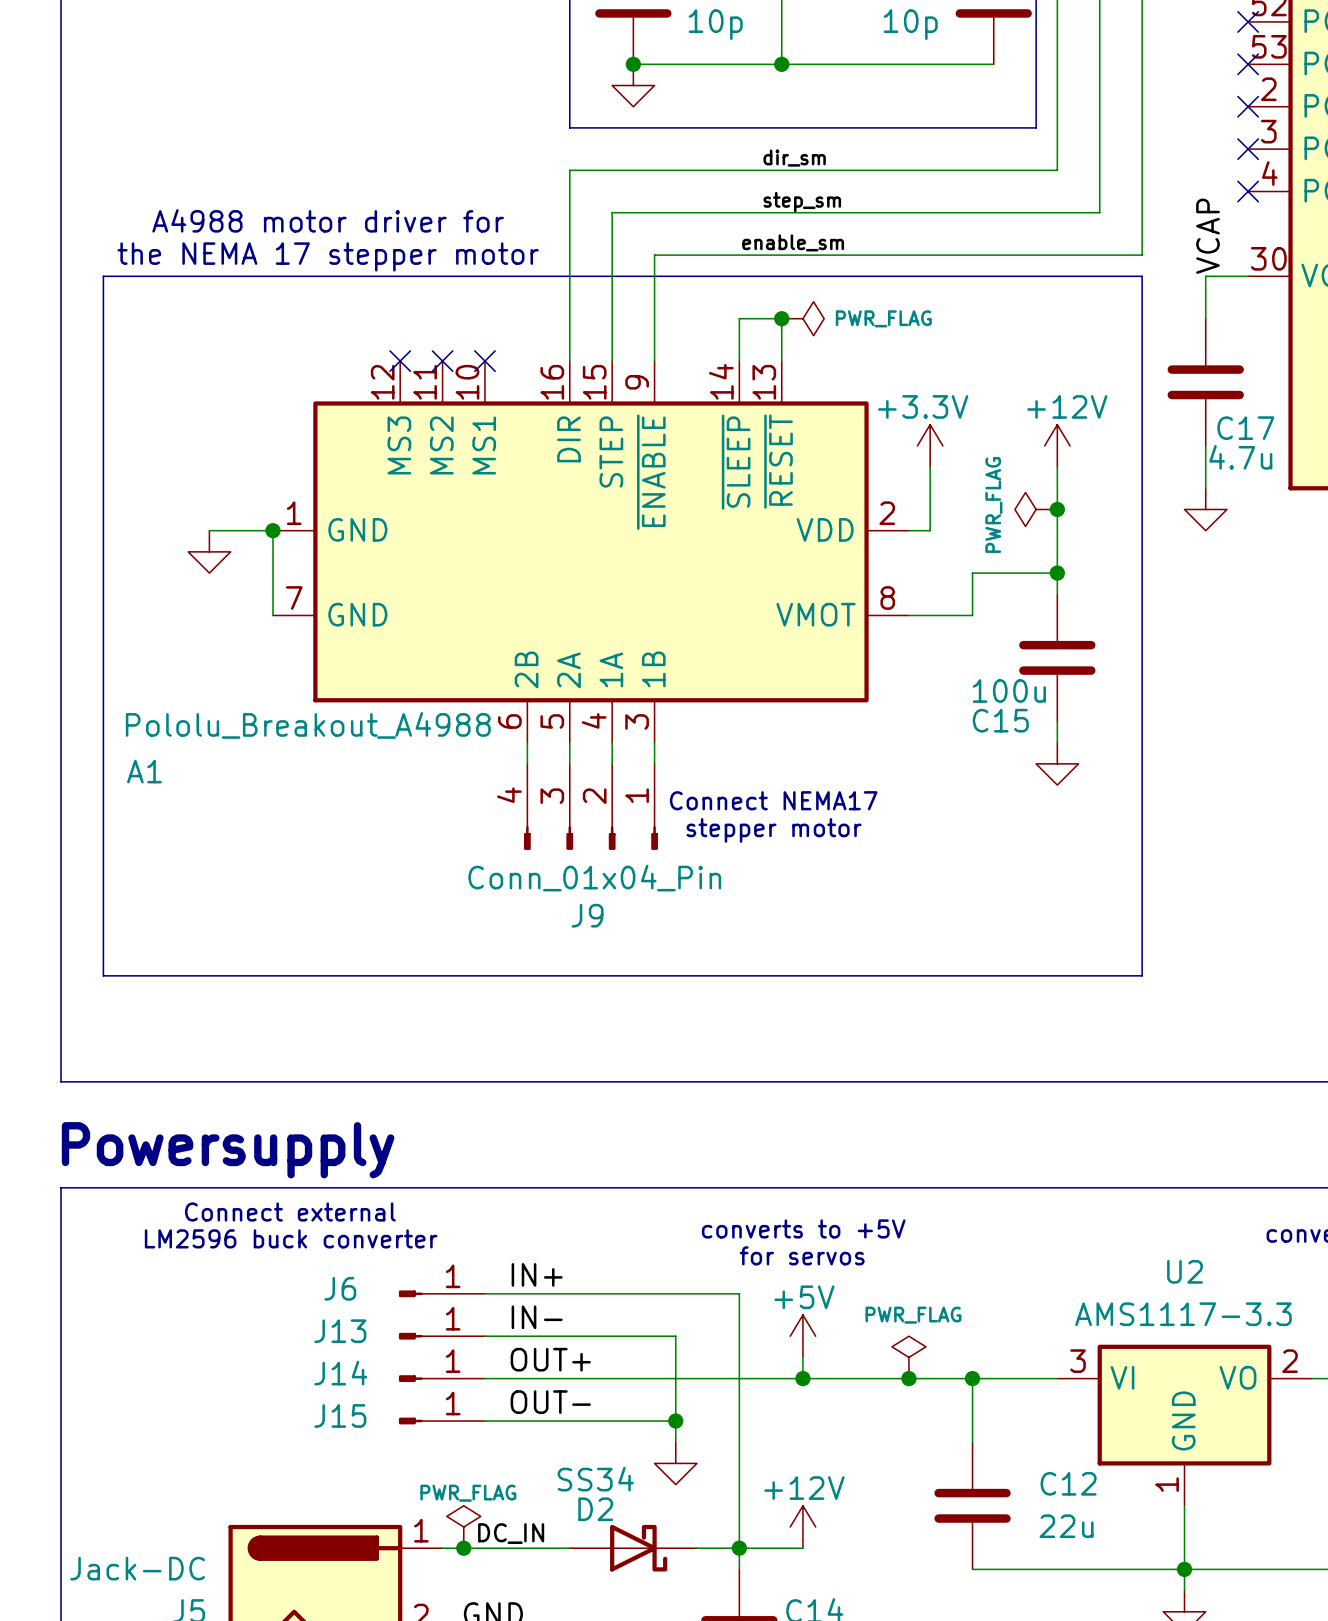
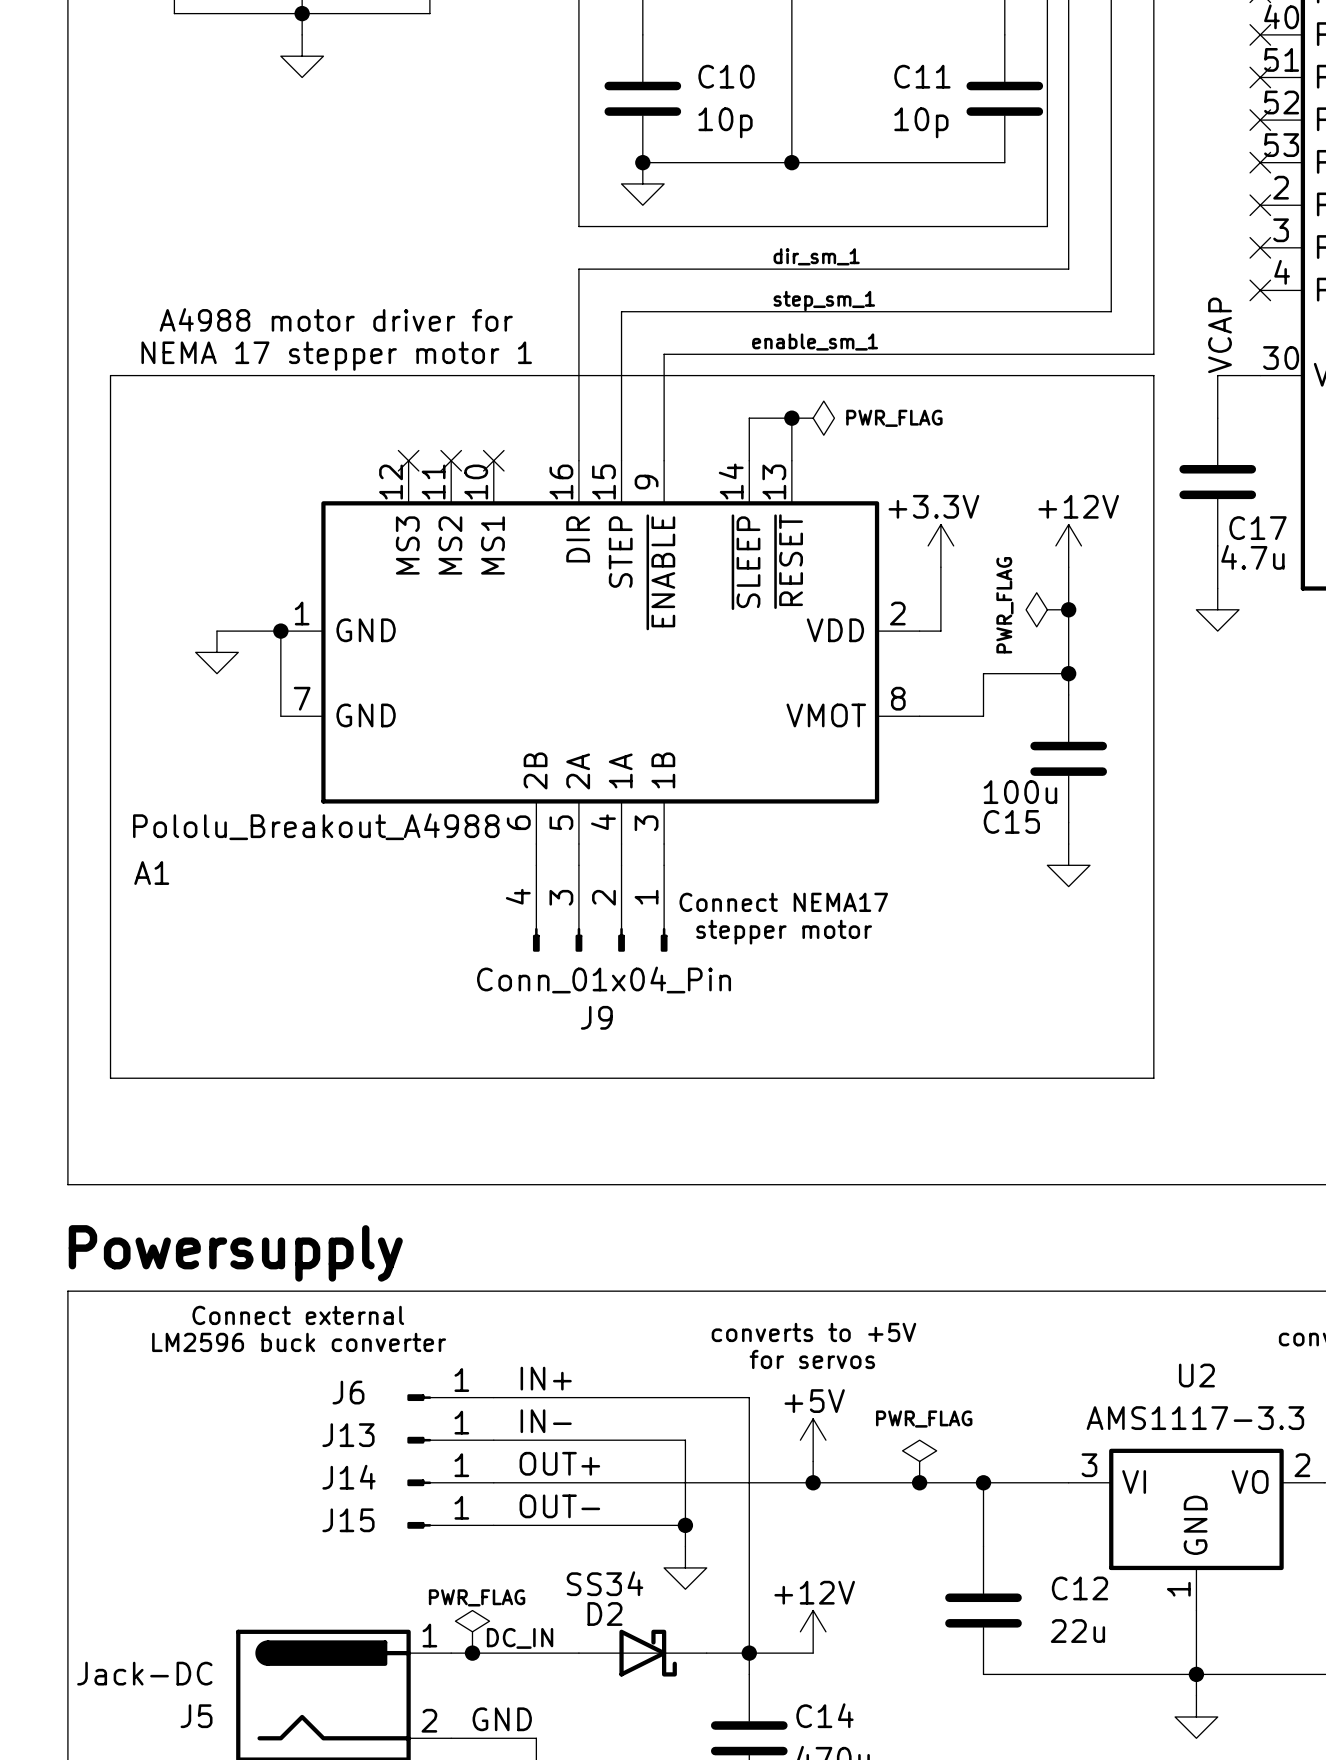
label: dir_sm (794, 158) -> dir_sm_1 (816, 256)
label: step_sm (802, 202) -> step_sm_1 (824, 301)
label: enable_sm (793, 242) -> enable_sm_1 (815, 342)
text: the NEMA 17 stepper motor (328, 256) -> NEMA 17 stepper motor 1 (336, 356)

